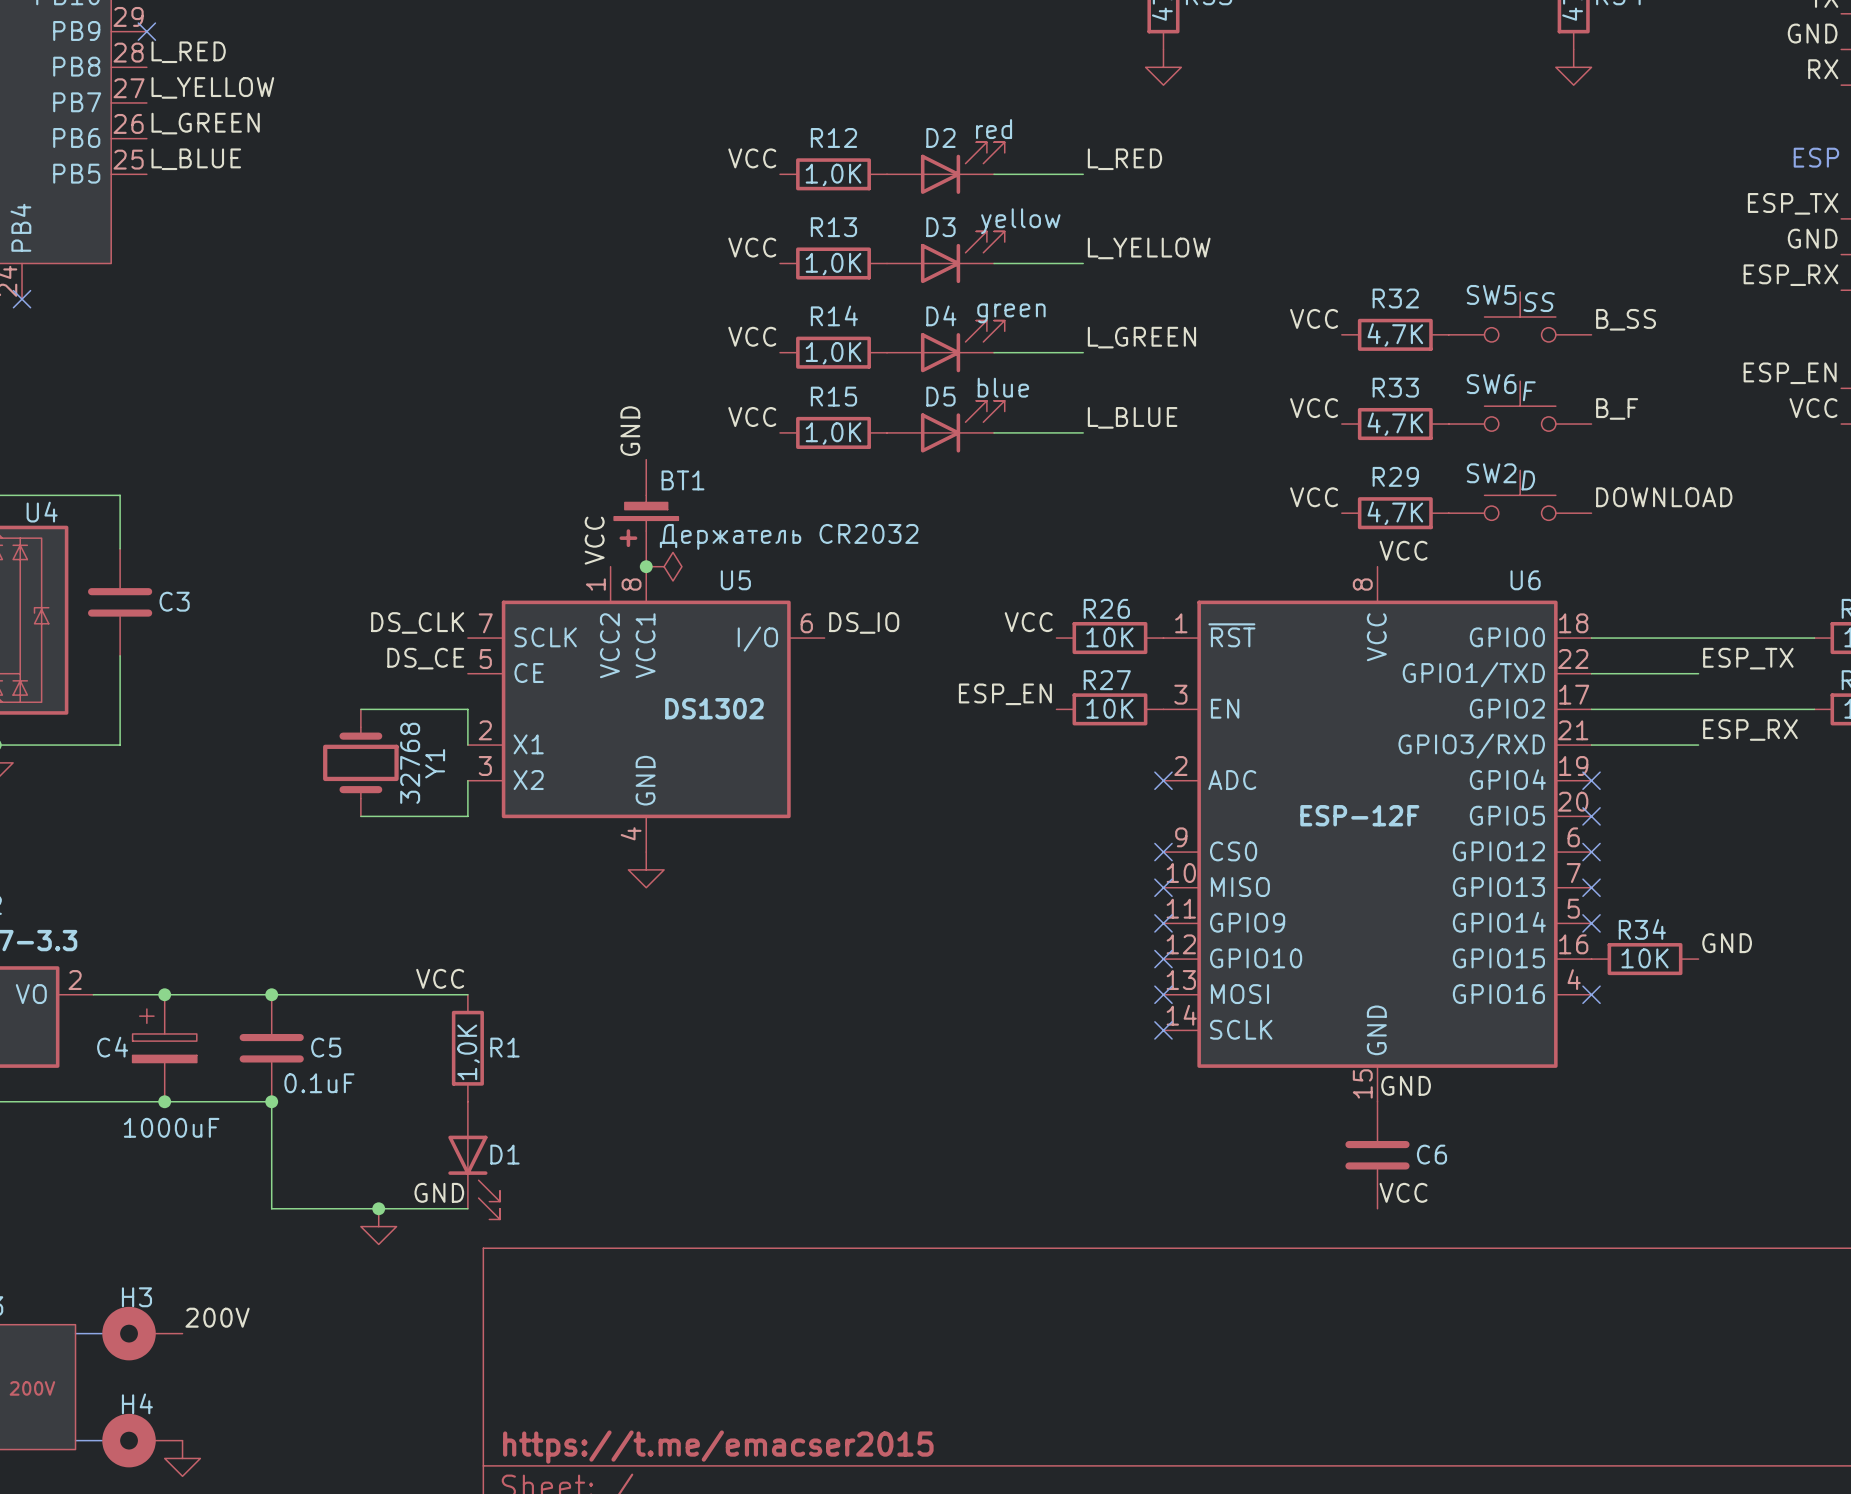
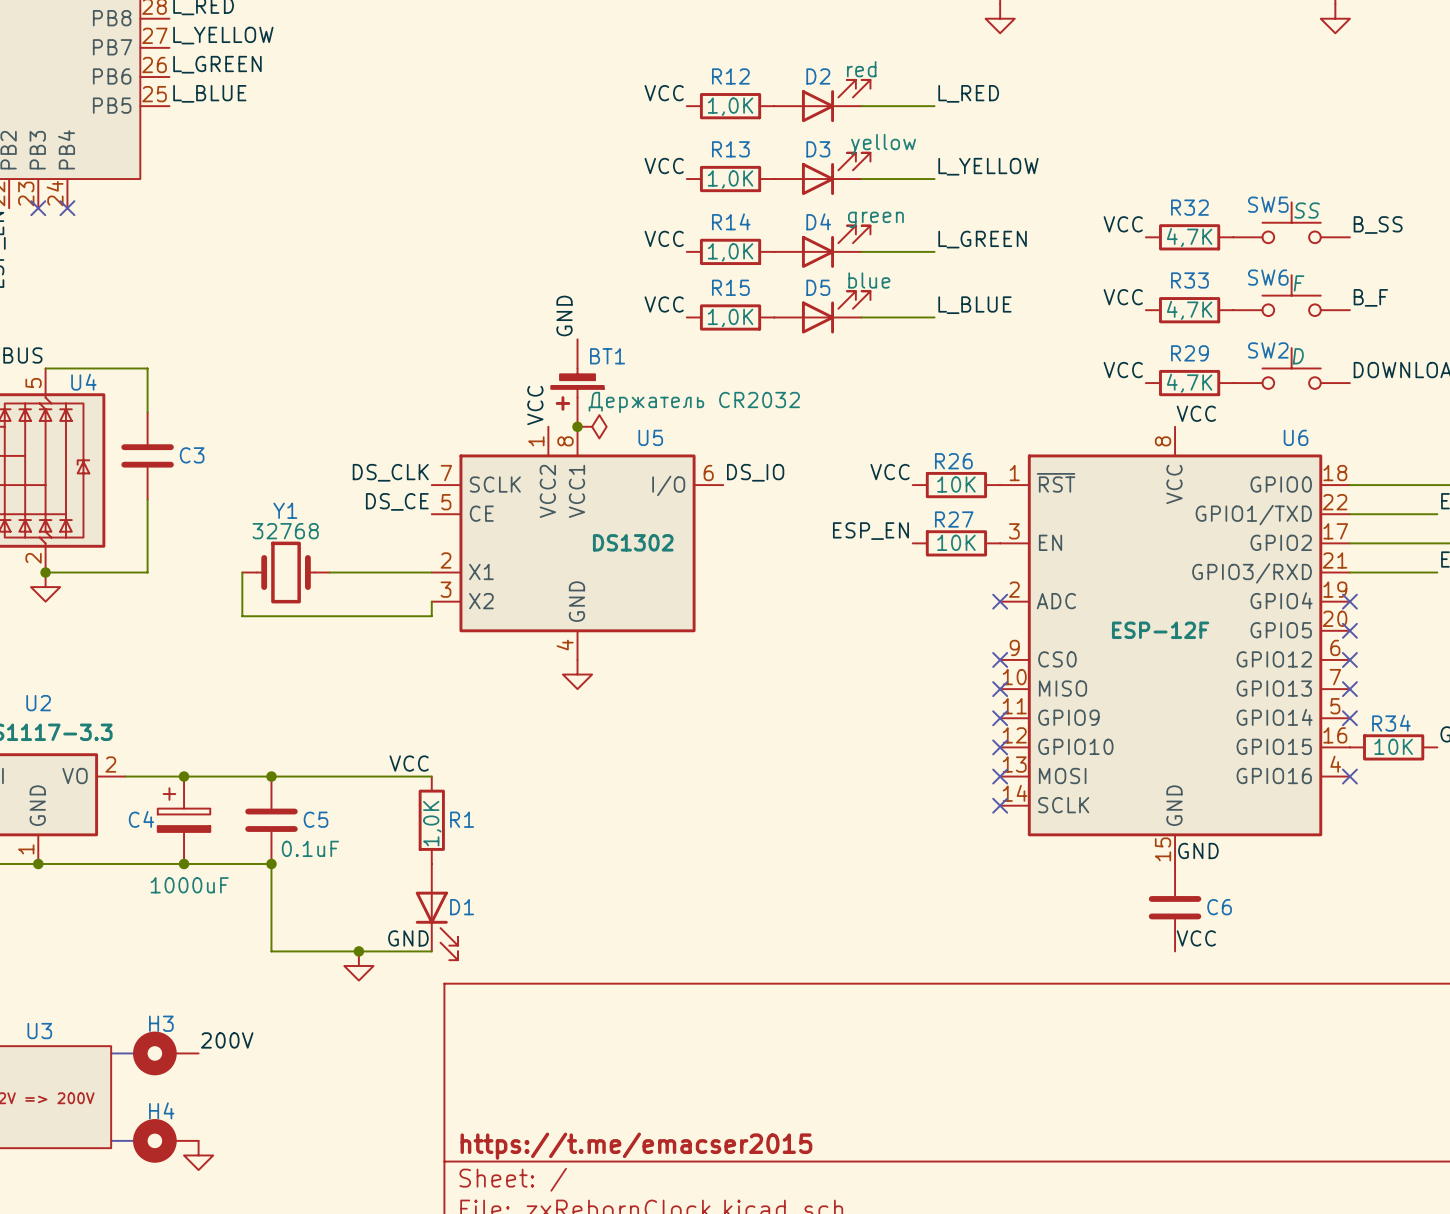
wire: (360, 709) (467, 709) (467, 745) -> (329, 572) (431, 572)
Y1 rotation: 0° (360, 762) -> 90° clockwise (286, 572)
Y1 position: (360, 762) -> (286, 572)
Y1 value position: 32768 (410, 763) -> 32768 (285, 531)
Y1 name position: Y1 (435, 763) -> Y1 (285, 510)
wire: (467, 798) (467, 816) (360, 816) -> (431, 616) (242, 616) (242, 572)

